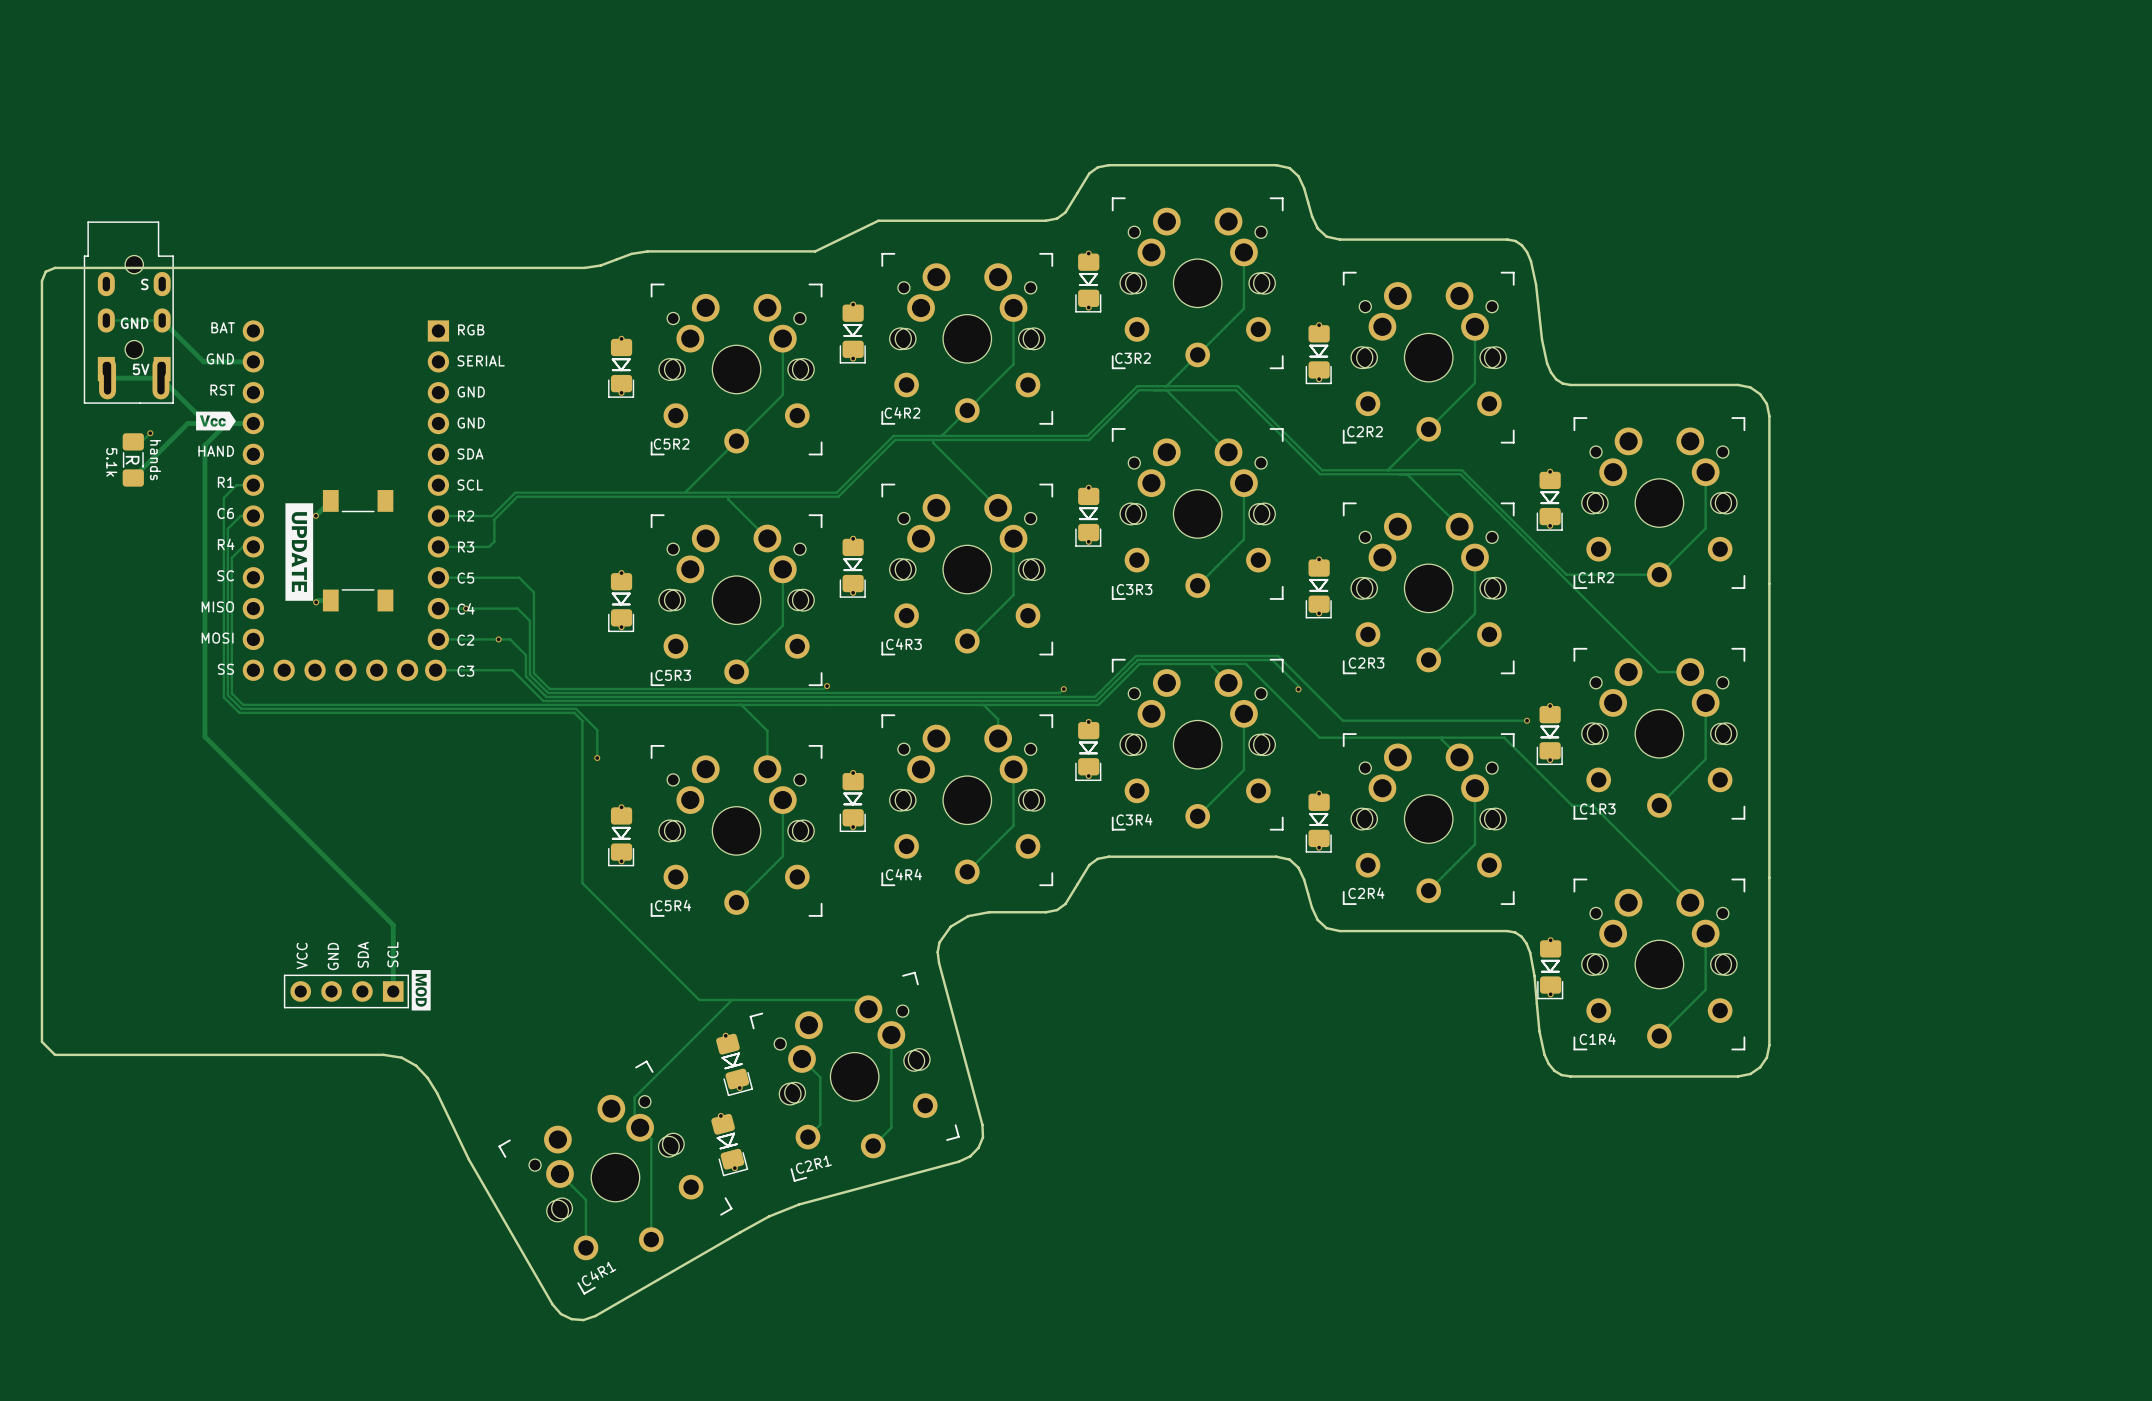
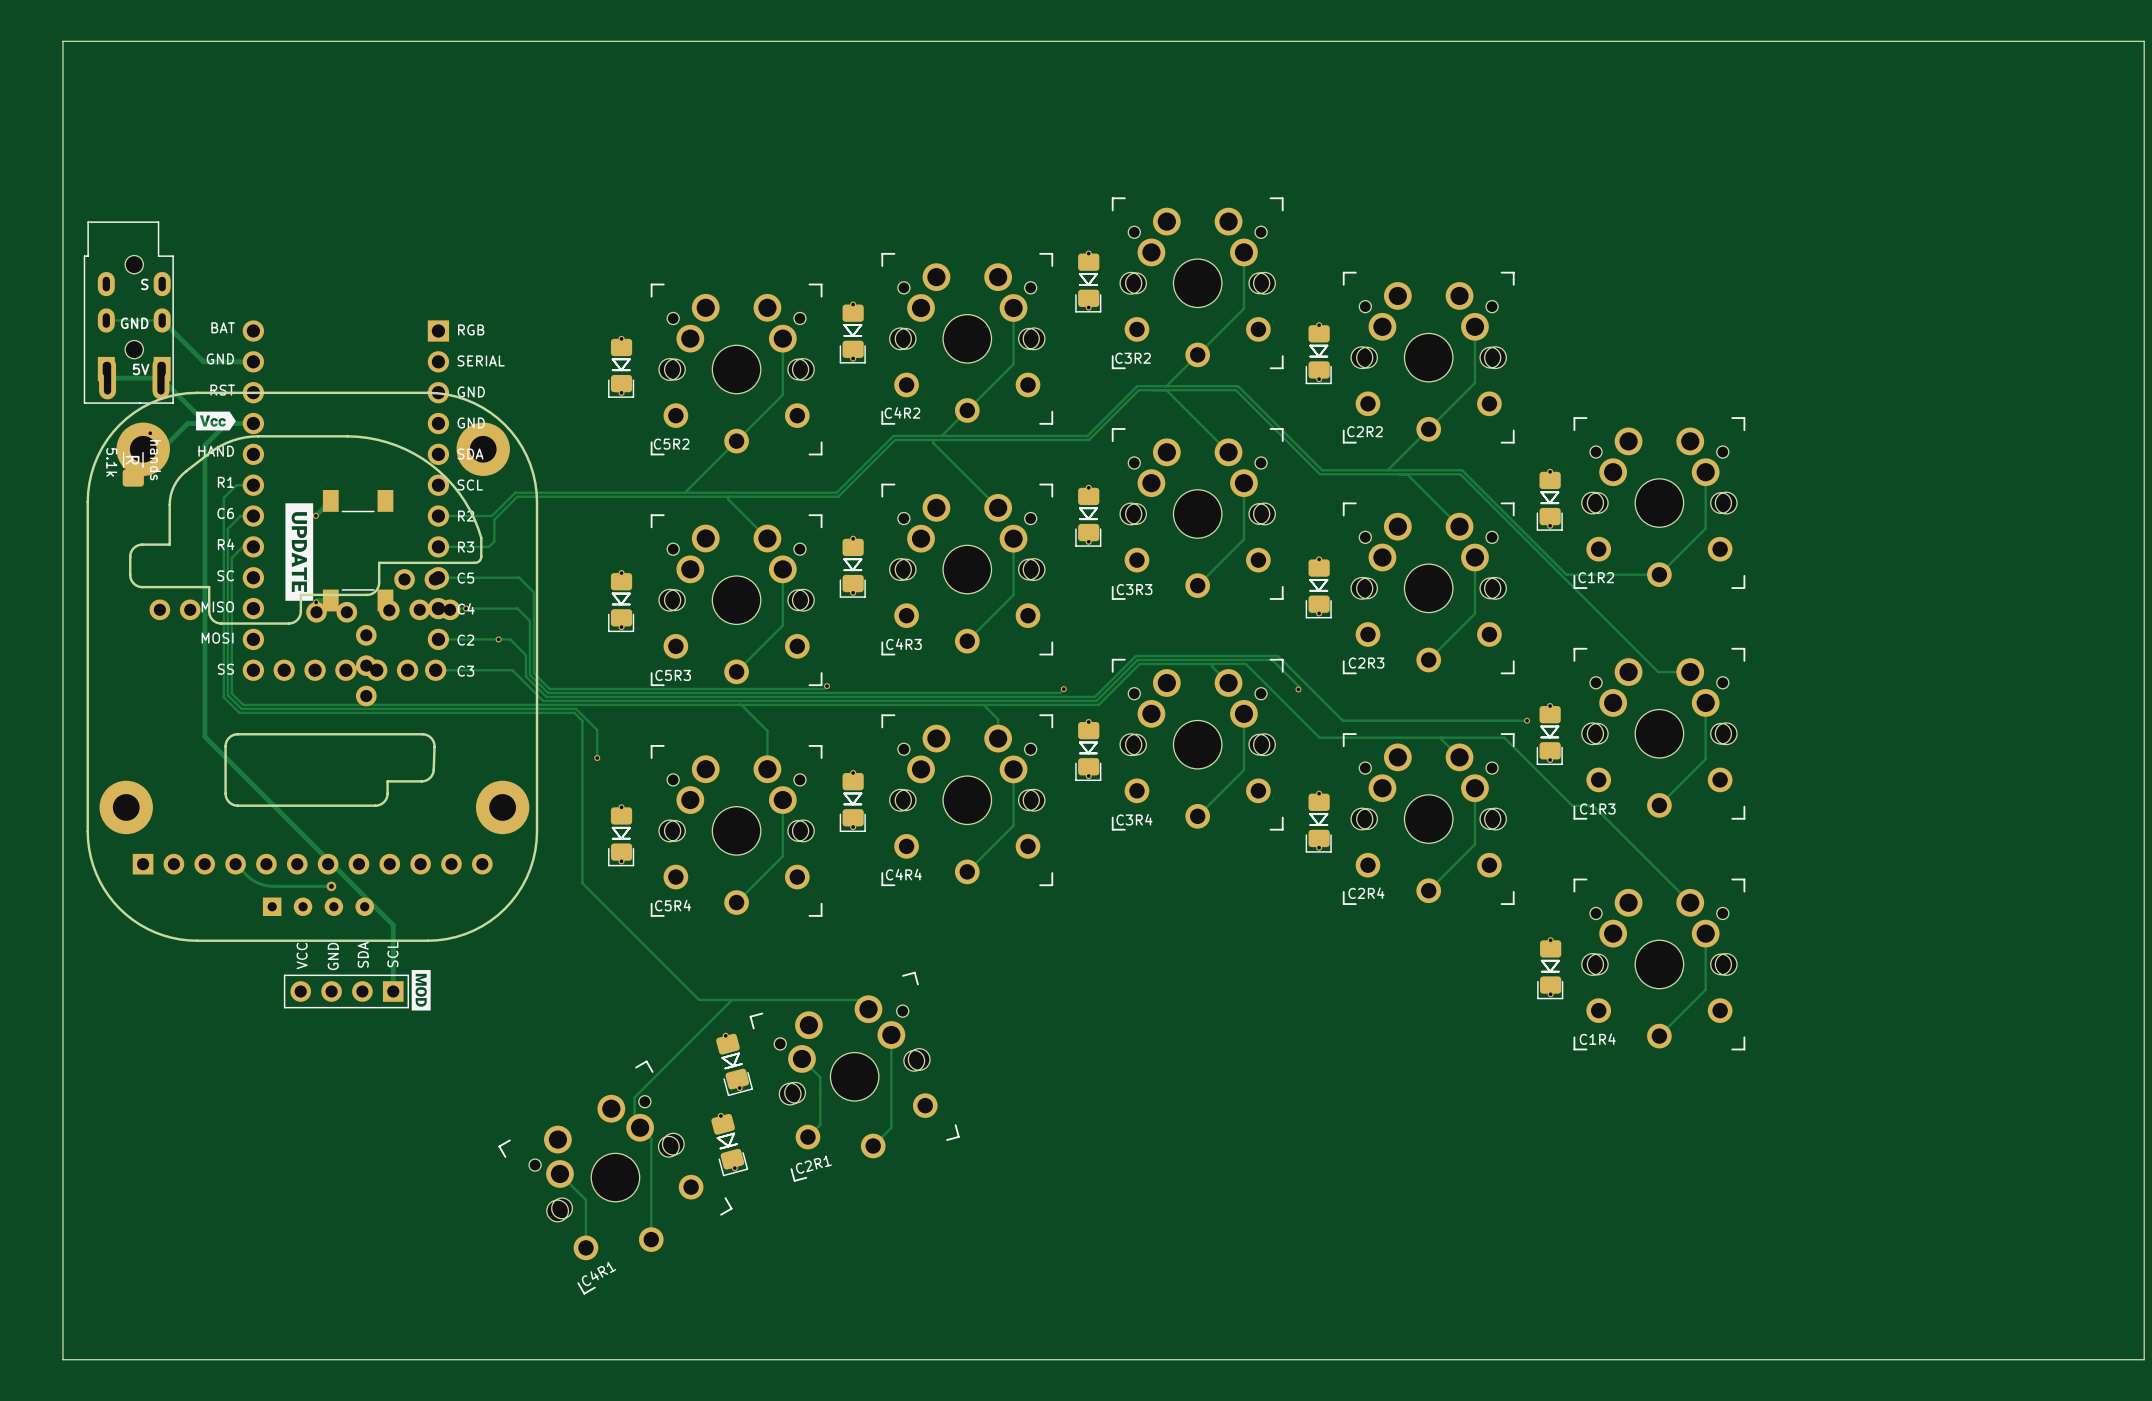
board edge: (1276, 165) (1289, 168) (1298, 176) (1312, 216) (1317, 228) (1326, 236) (1339, 239) (1507, 239) (1515, 241) (1521, 245) (1530, 261) (1536, 284) (1542, 339) (1547, 363) (1556, 379) (1562, 383) (1738, 384) (1750, 387) (1760, 394) (1766, 403) (1769, 416) (1769, 1045) (1766, 1057) (1760, 1067) (1750, 1073) (1738, 1076) (1561, 1075) (1554, 1070) (1544, 1054) (1539, 1031) (1534, 976) (1530, 952) (1521, 936) (1515, 932) (1339, 931) (1326, 928) (1317, 919) (1312, 907) (1298, 867) (1289, 859) (1276, 856) (1108, 856) (1097, 858) (1089, 864) (1065, 903) (1057, 910) (1046, 912) (989, 912) (968, 916) (950, 926) (939, 942) (937, 952) (939, 963) (982, 1124) (982, 1137) (978, 1147) (970, 1156) (958, 1161) (798, 1204) (768, 1216) (595, 1316) (583, 1320) (571, 1319) (560, 1314) (552, 1304) (468, 1159) (437, 1093) (427, 1078) (416, 1065) (401, 1057) (383, 1054) (55, 1054) (41, 1041) (41, 280) (45, 271) (55, 267) (584, 267) (600, 265) (631, 253) (647, 251) (815, 251) (878, 220) (1046, 220) (1057, 218) (1065, 212) (1089, 173) (1097, 167) (1108, 165) (1276, 165) -> (2144, 41) (2144, 1359) (62, 1359) (62, 41) (2144, 41)
part: none -> (143, 449)
part: none -> (483, 449)
part: none -> (312, 666)
part: none -> (126, 807)
part: none -> (502, 807)
track: none -> (235, 864) (250, 878) (263, 885) (331, 886)
via: none -> (331, 886)

